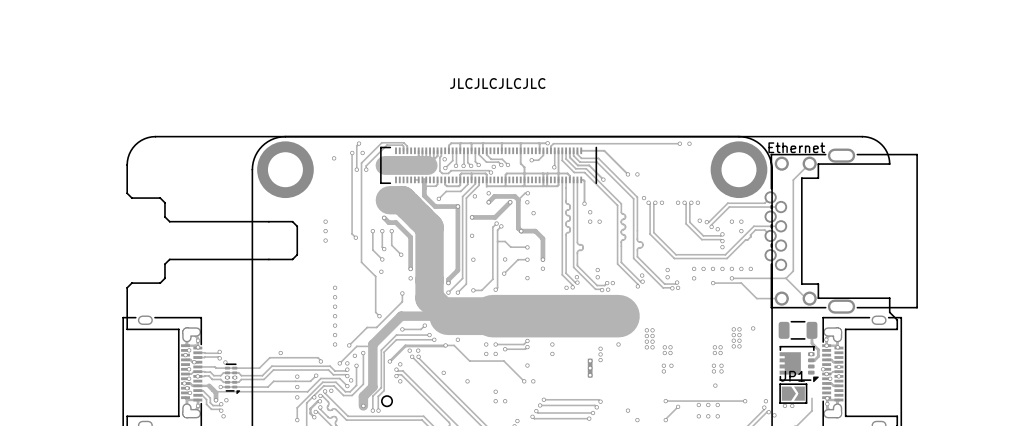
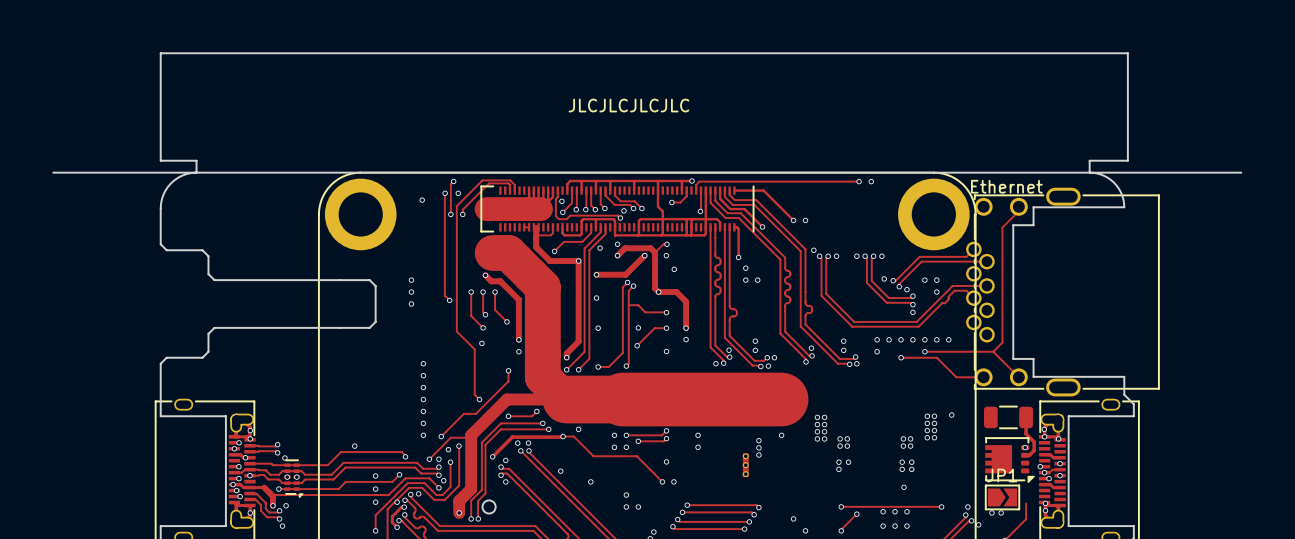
board edge: none -> (53, 172) (196, 172) (196, 160) (160, 160) (160, 53) (1127, 53) (1127, 160) (1089, 160) (1089, 172) (1241, 172)
part footprint: [764, 148, 918, 314] -> [966, 187, 1160, 397]

